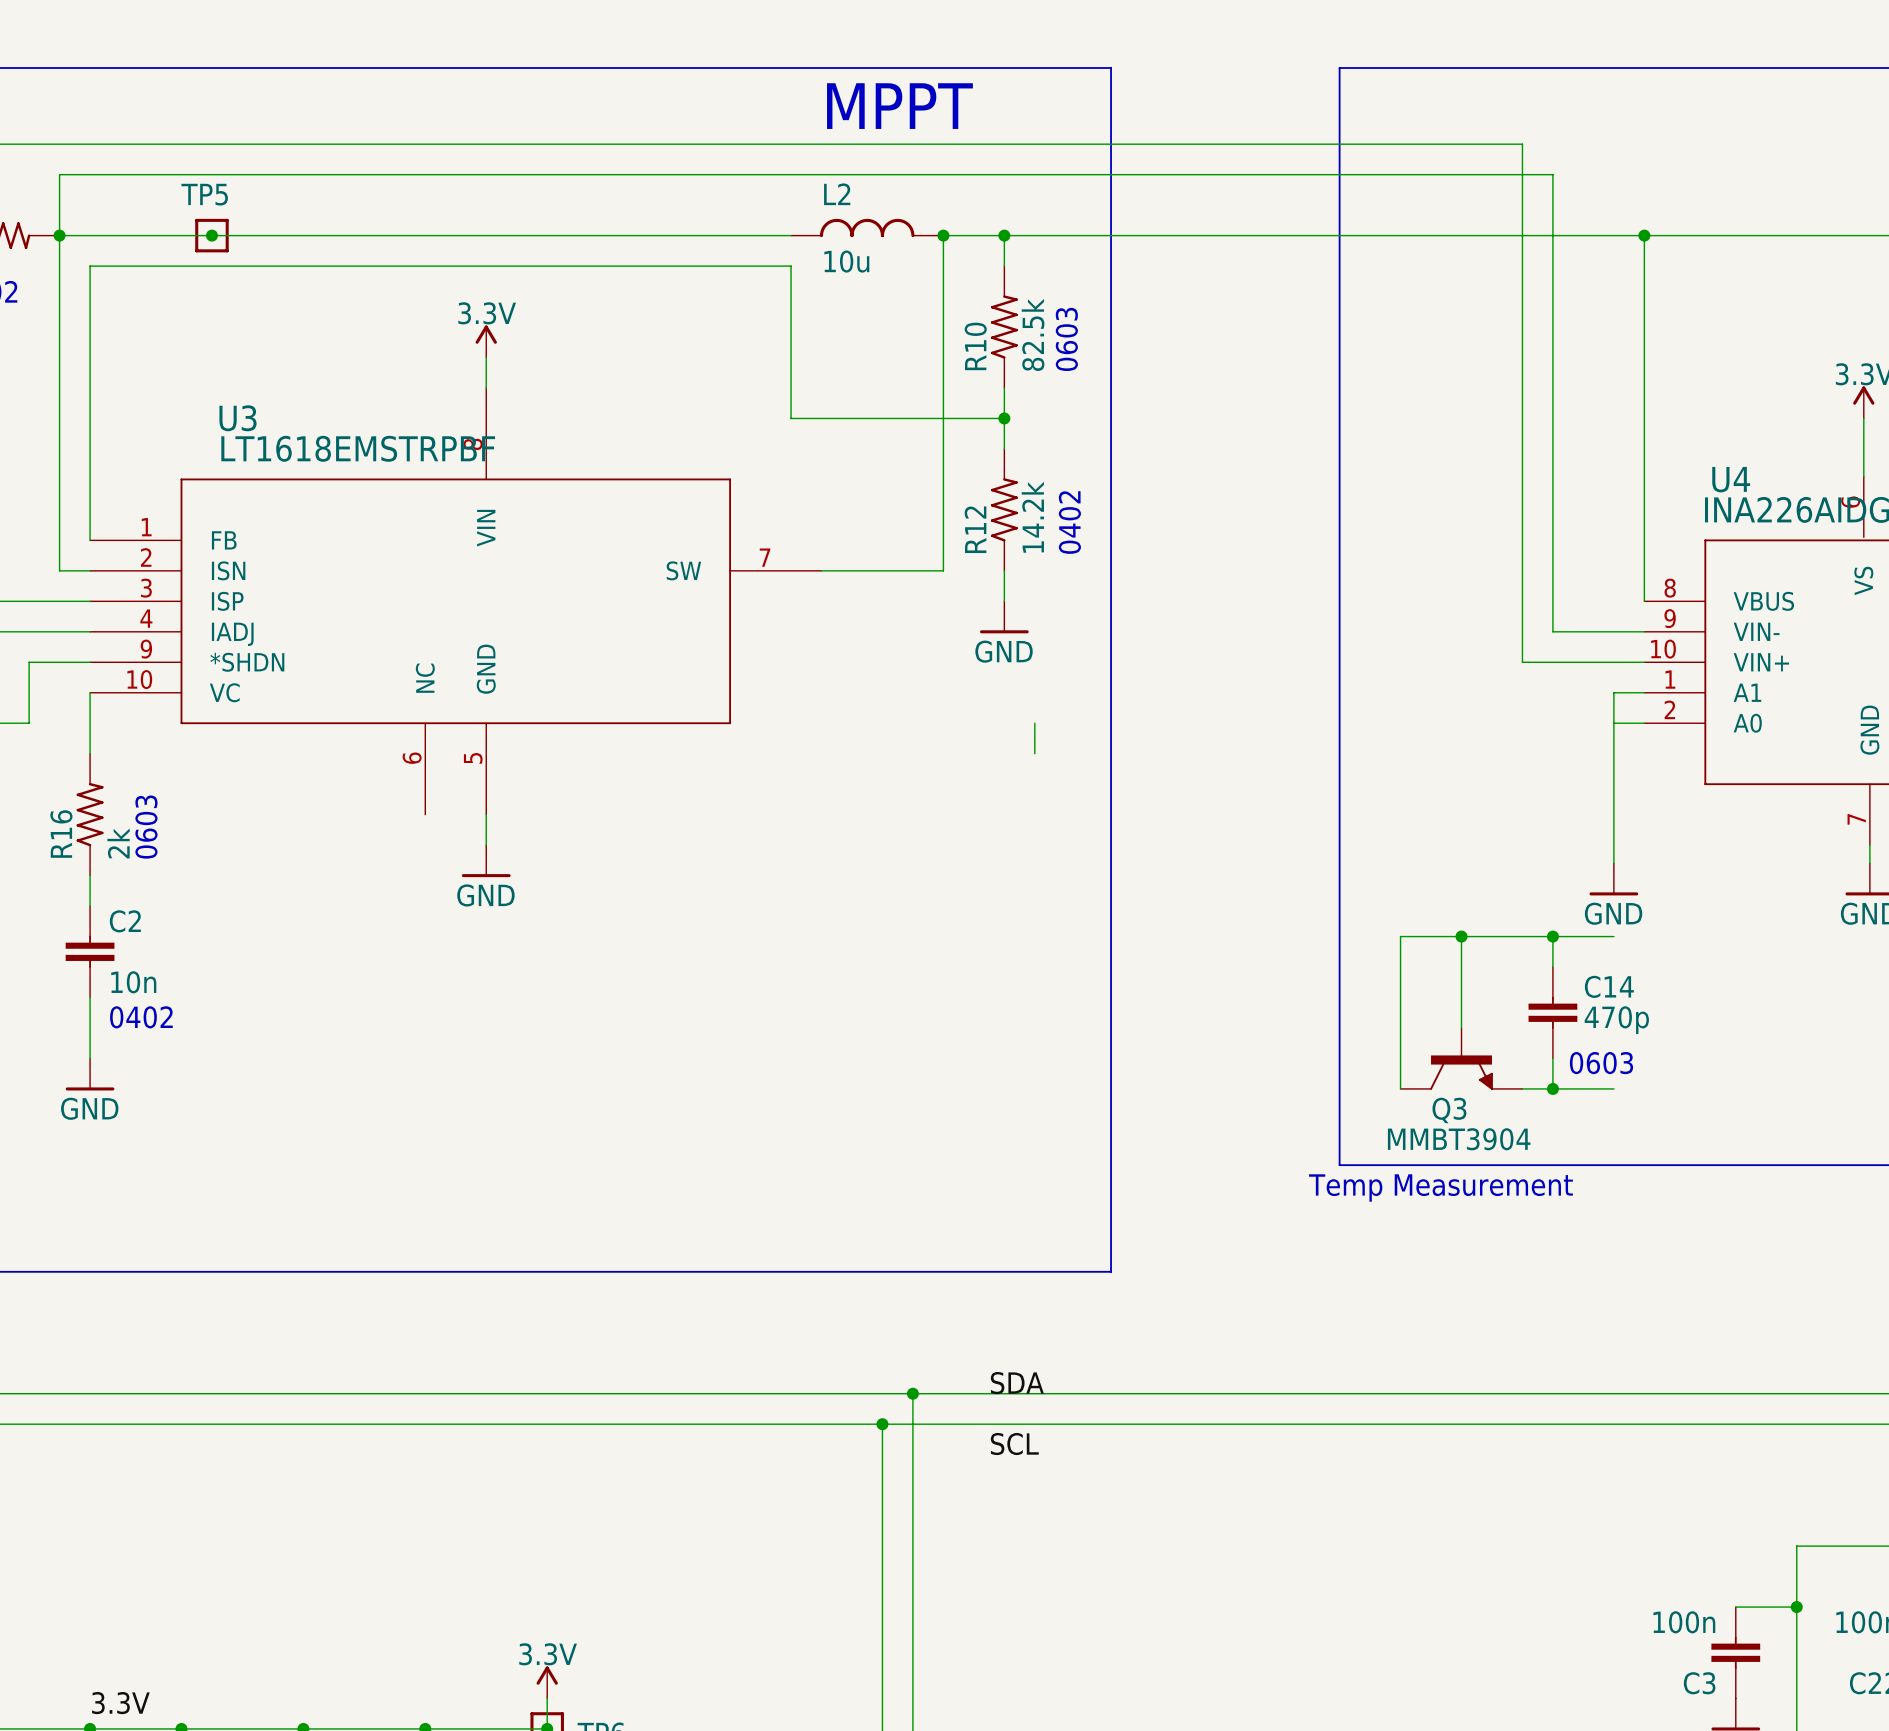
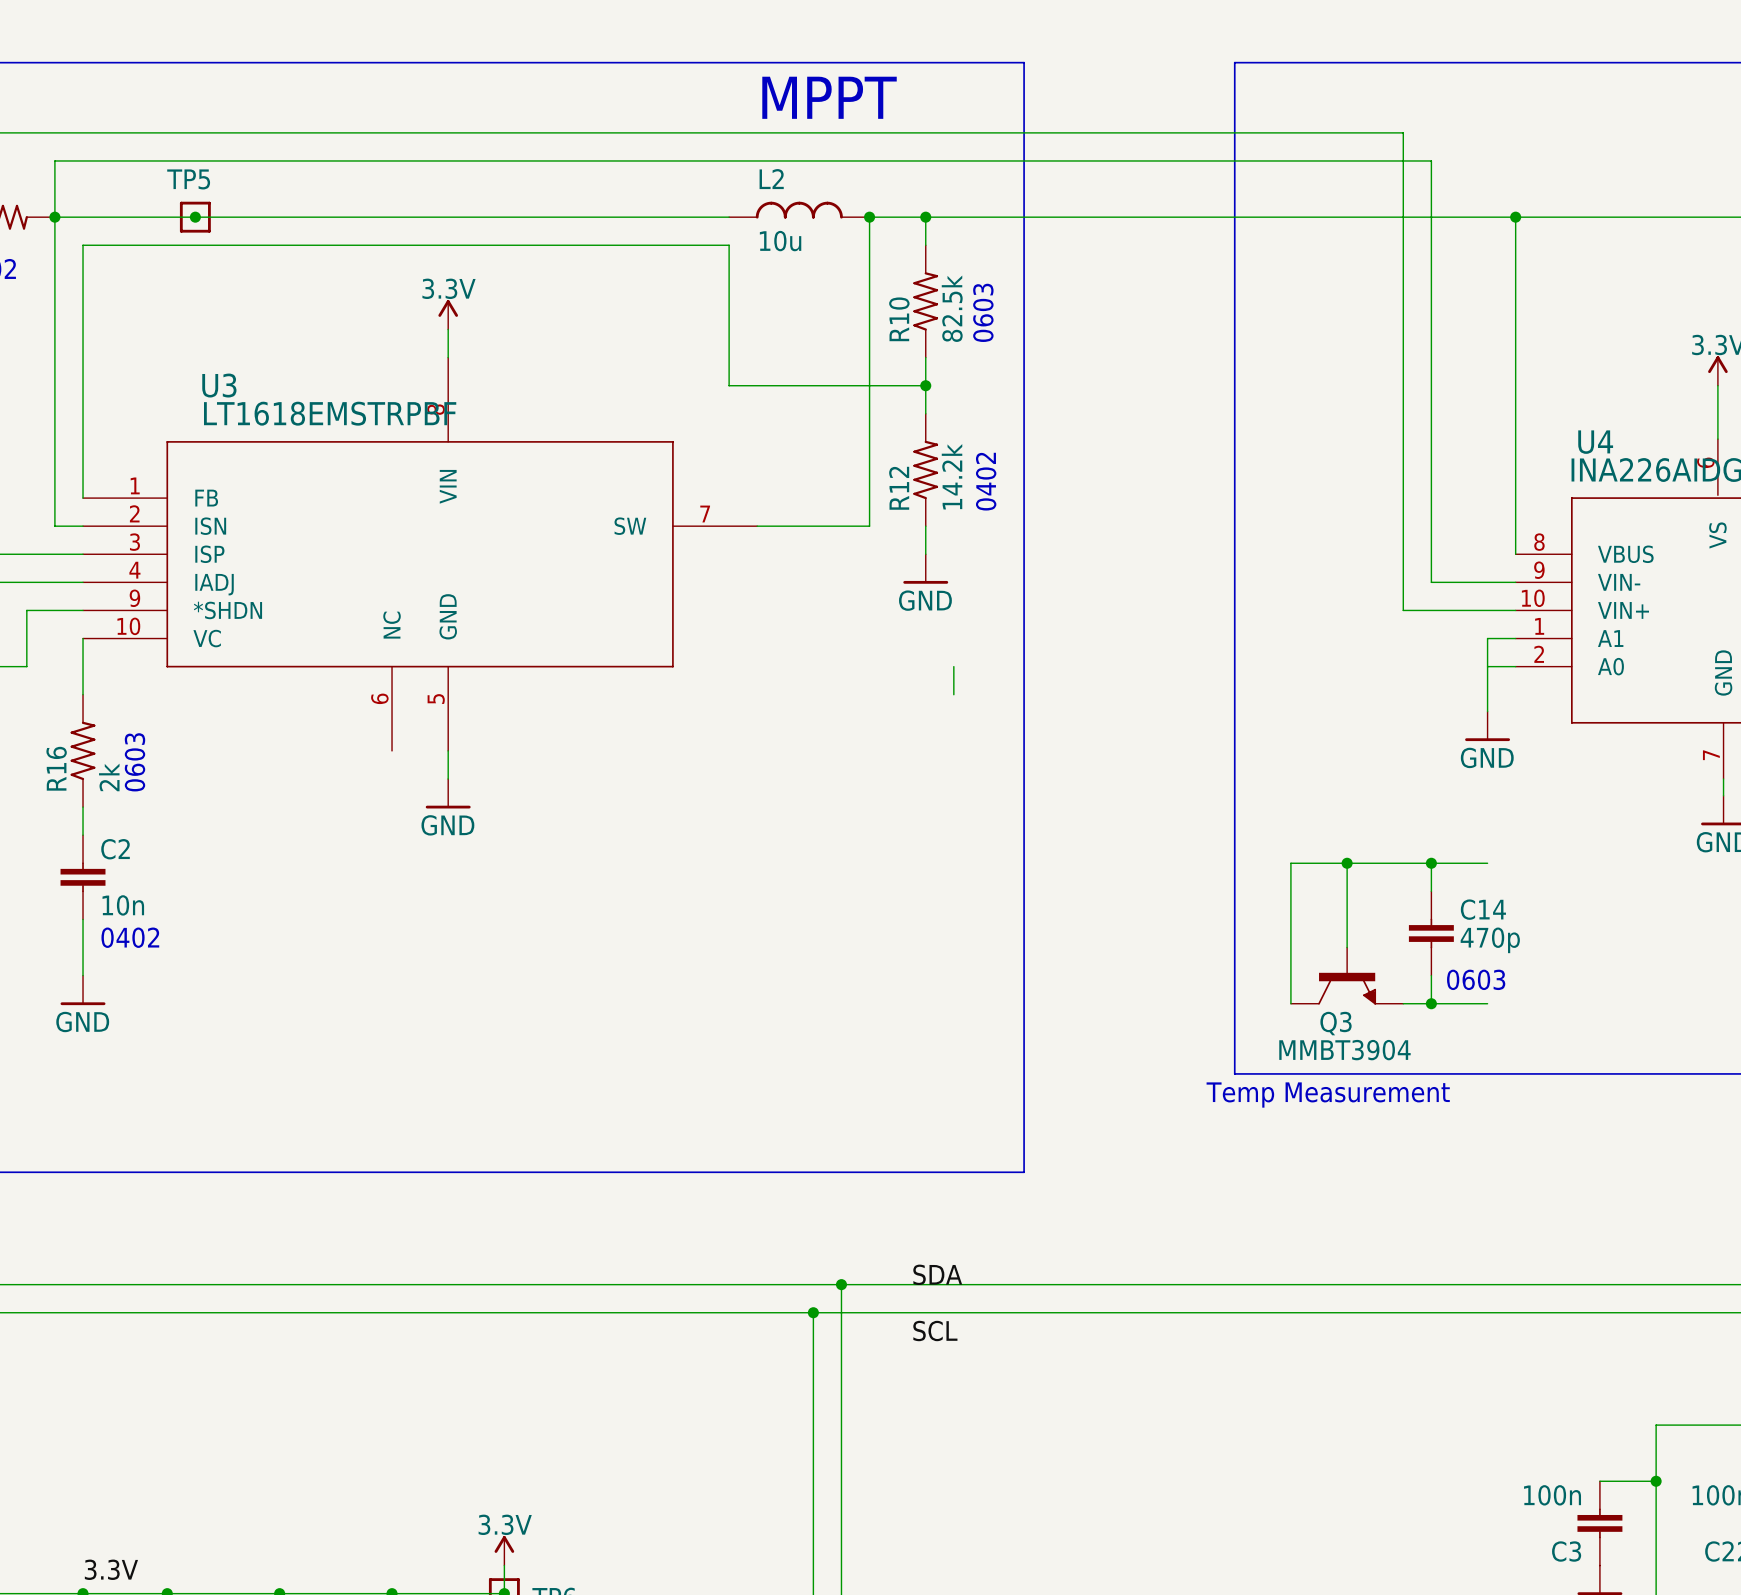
wire: (1613, 772) (1613, 863) -> none
power symbol position: GND (1613, 879) -> GND (1487, 726)

